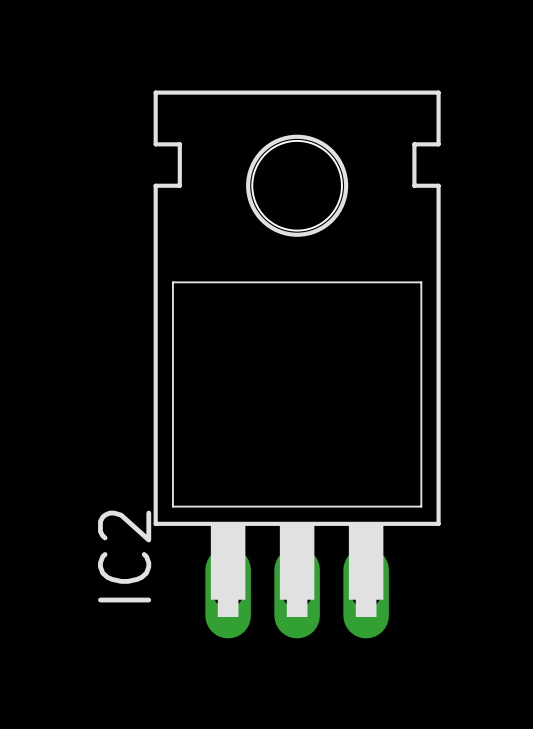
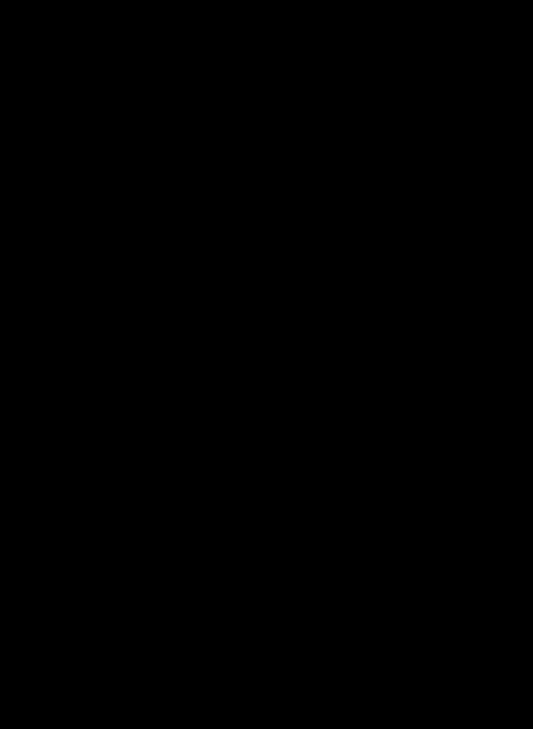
IC2: (297, 364) -> none

